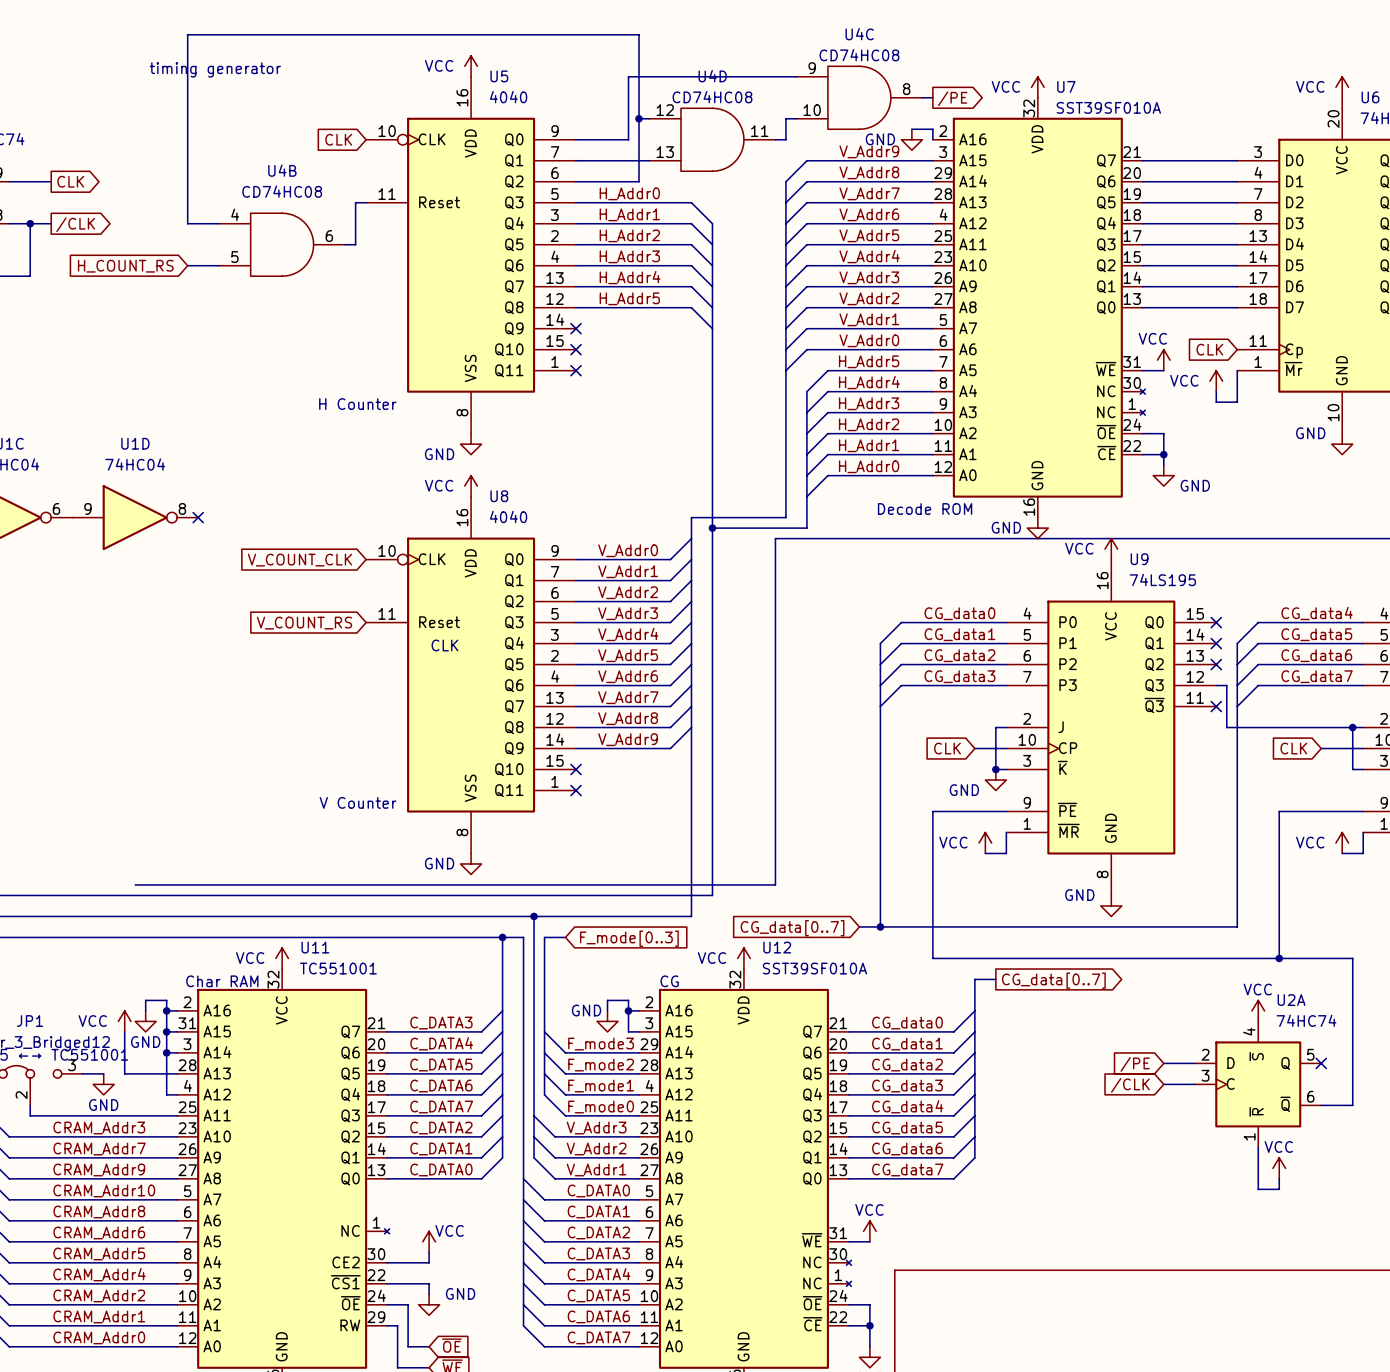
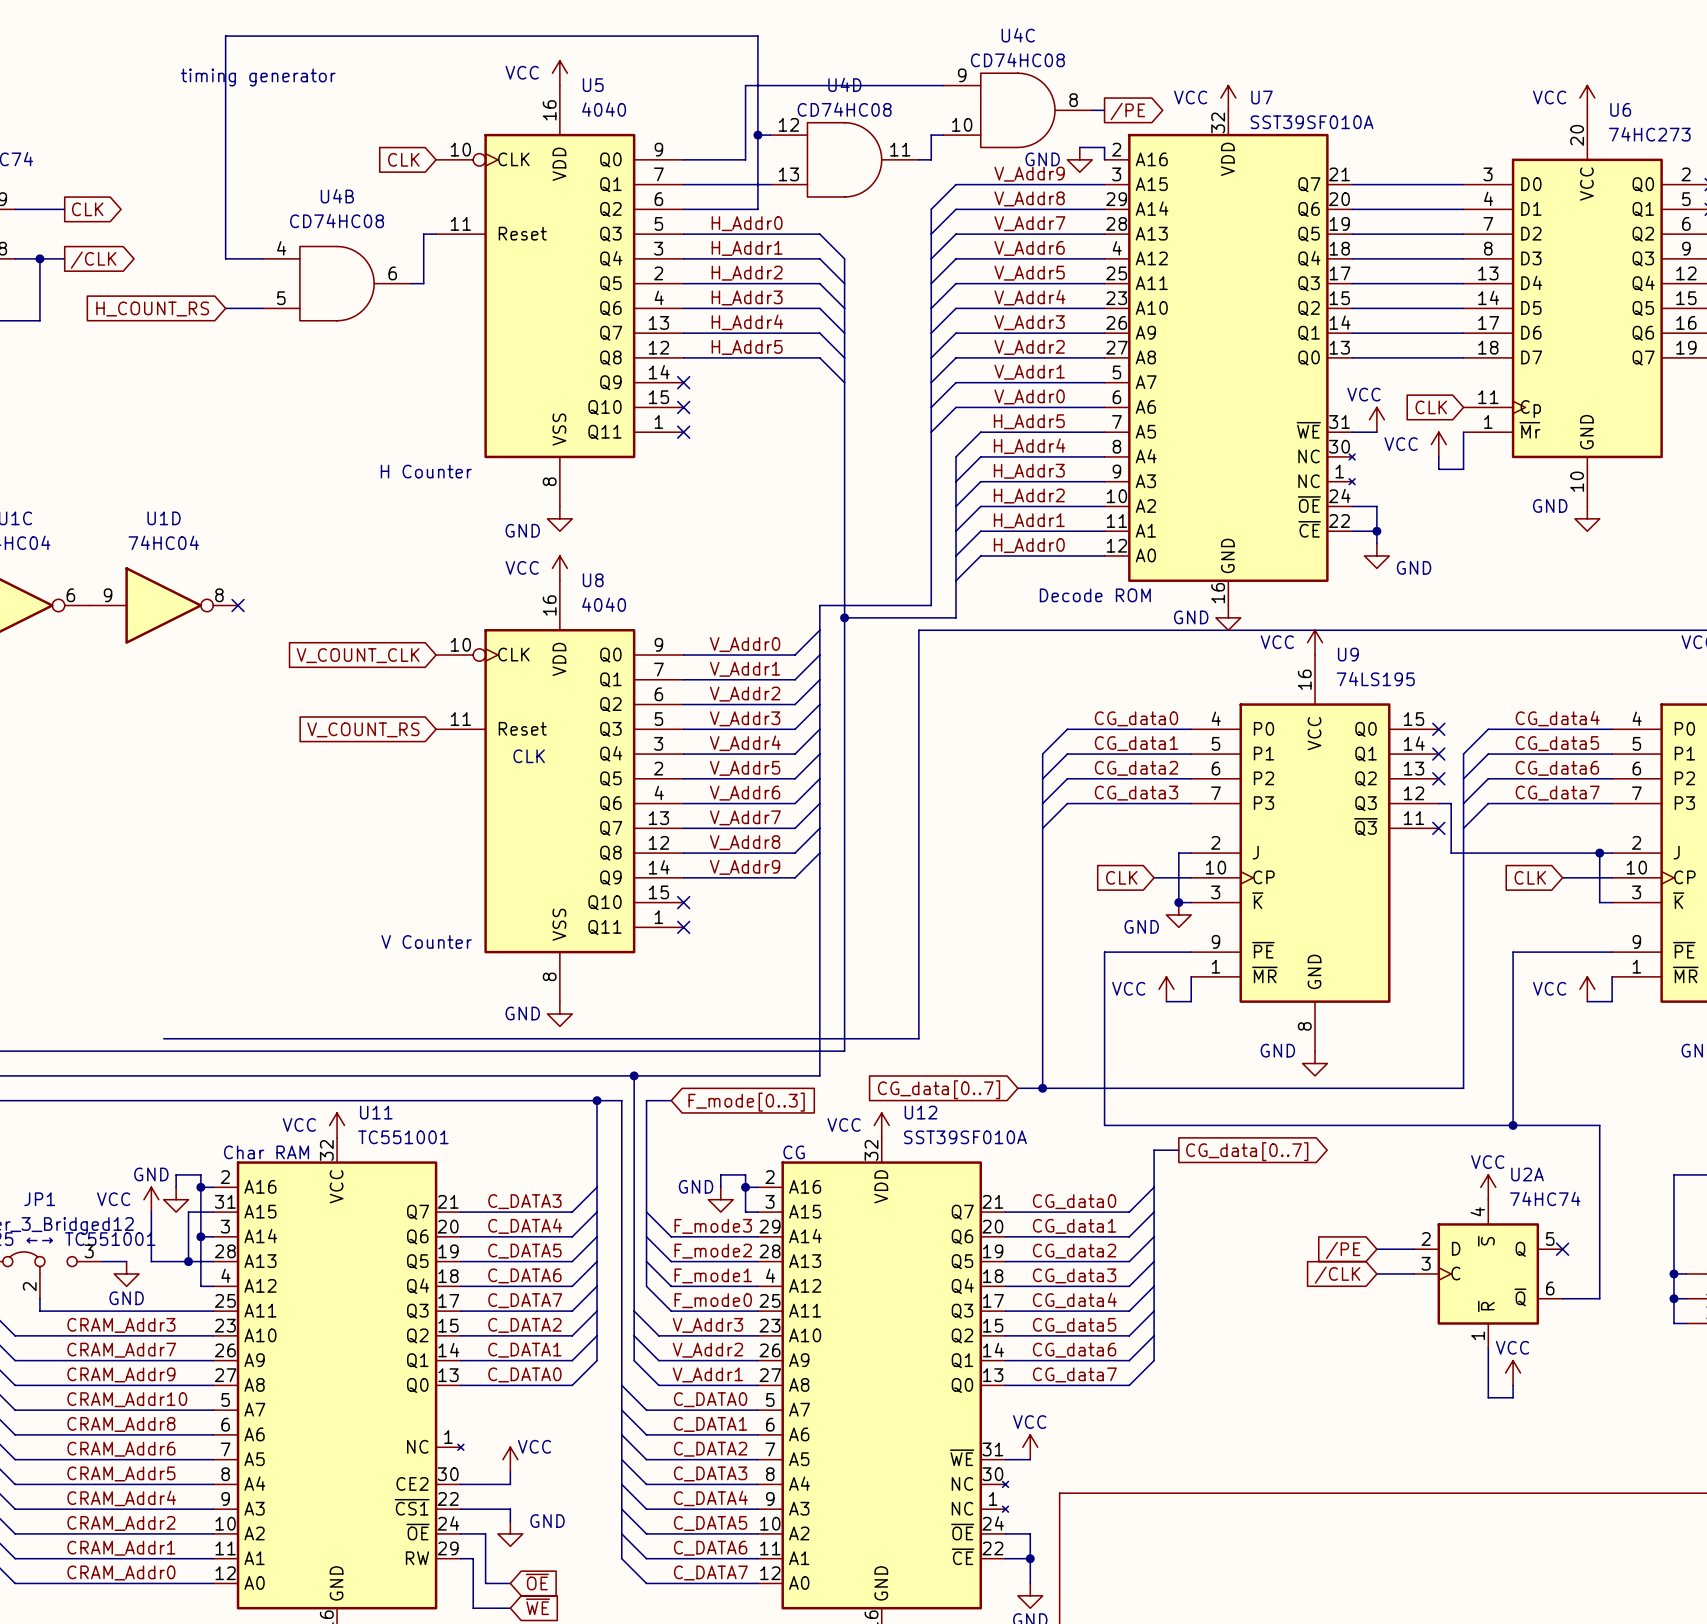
wire: none -> (200, 1212) (188, 1212) (188, 1261)
junction position: (166, 1031) -> (188, 1261)
power symbol text position: GND (145, 1042) -> GND (151, 1174)

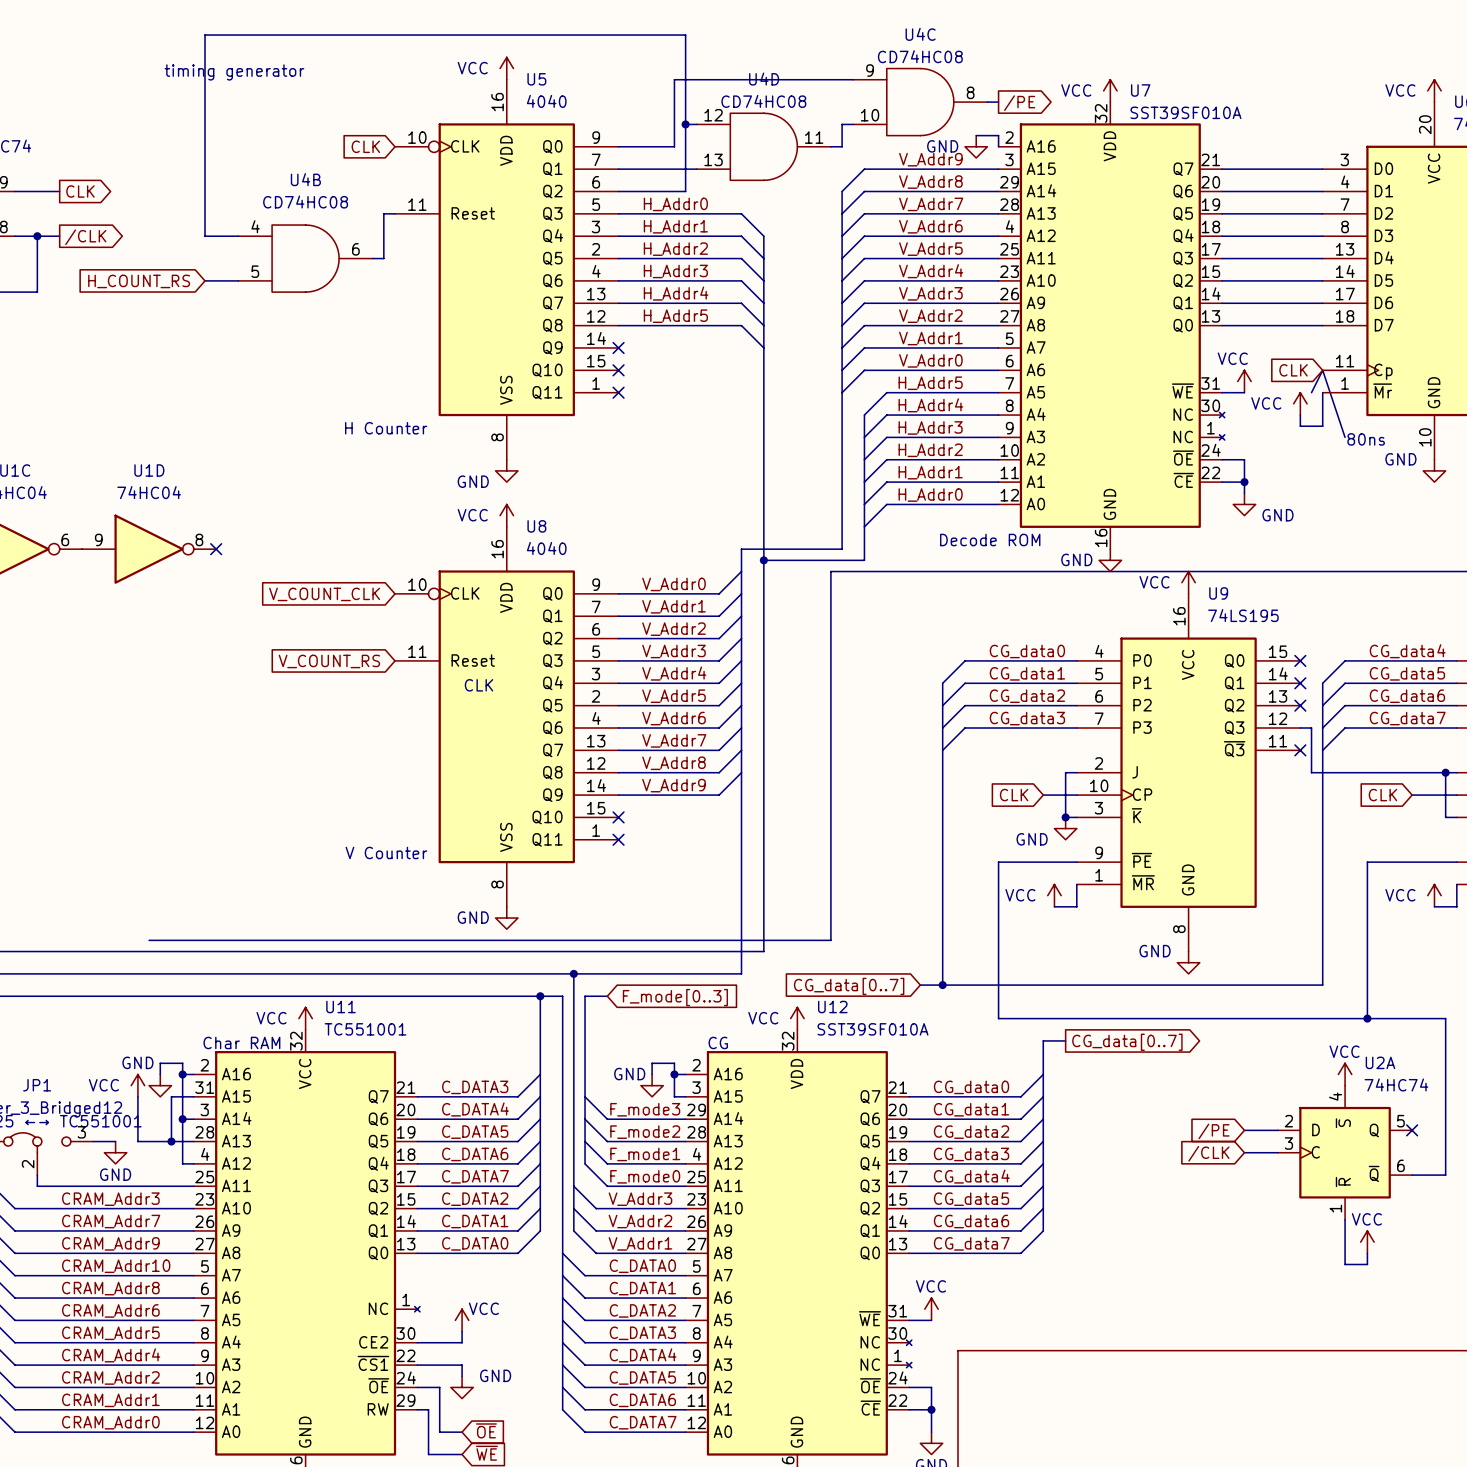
line: none -> (1311, 392) (1322, 370) (1345, 437)
text: none -> 80ns (1366, 439)

